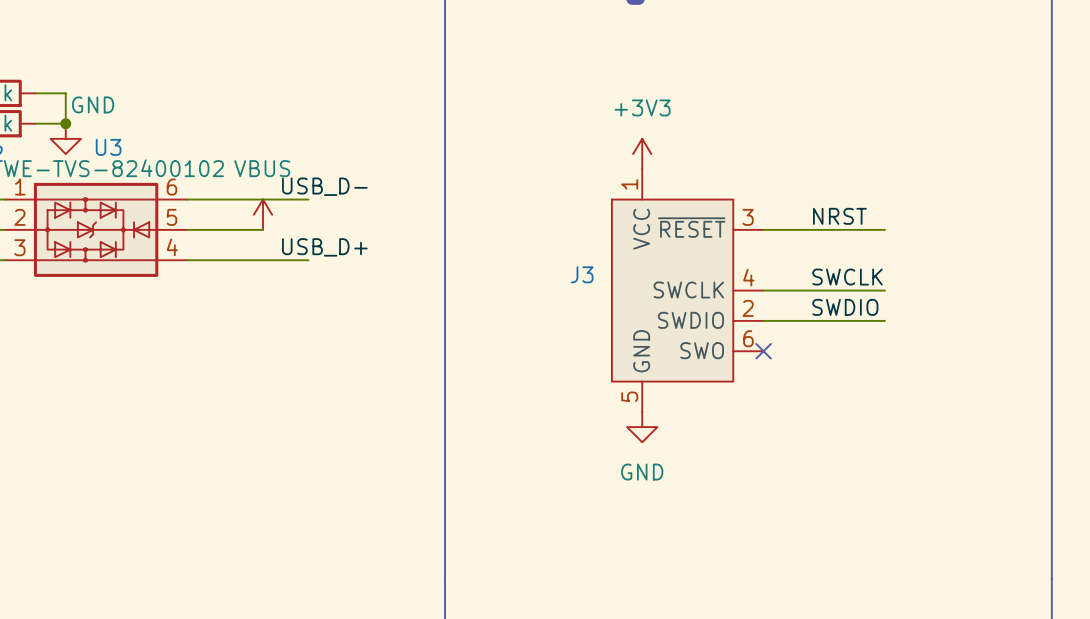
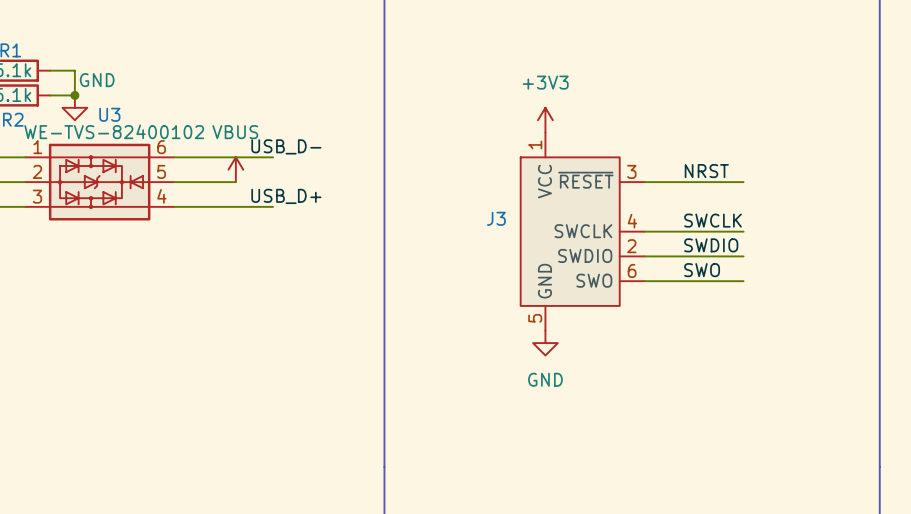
label: none -> SWO (702, 270)
wire: none -> (644, 281) (743, 281)
no-connect mark: (763, 351) -> none

